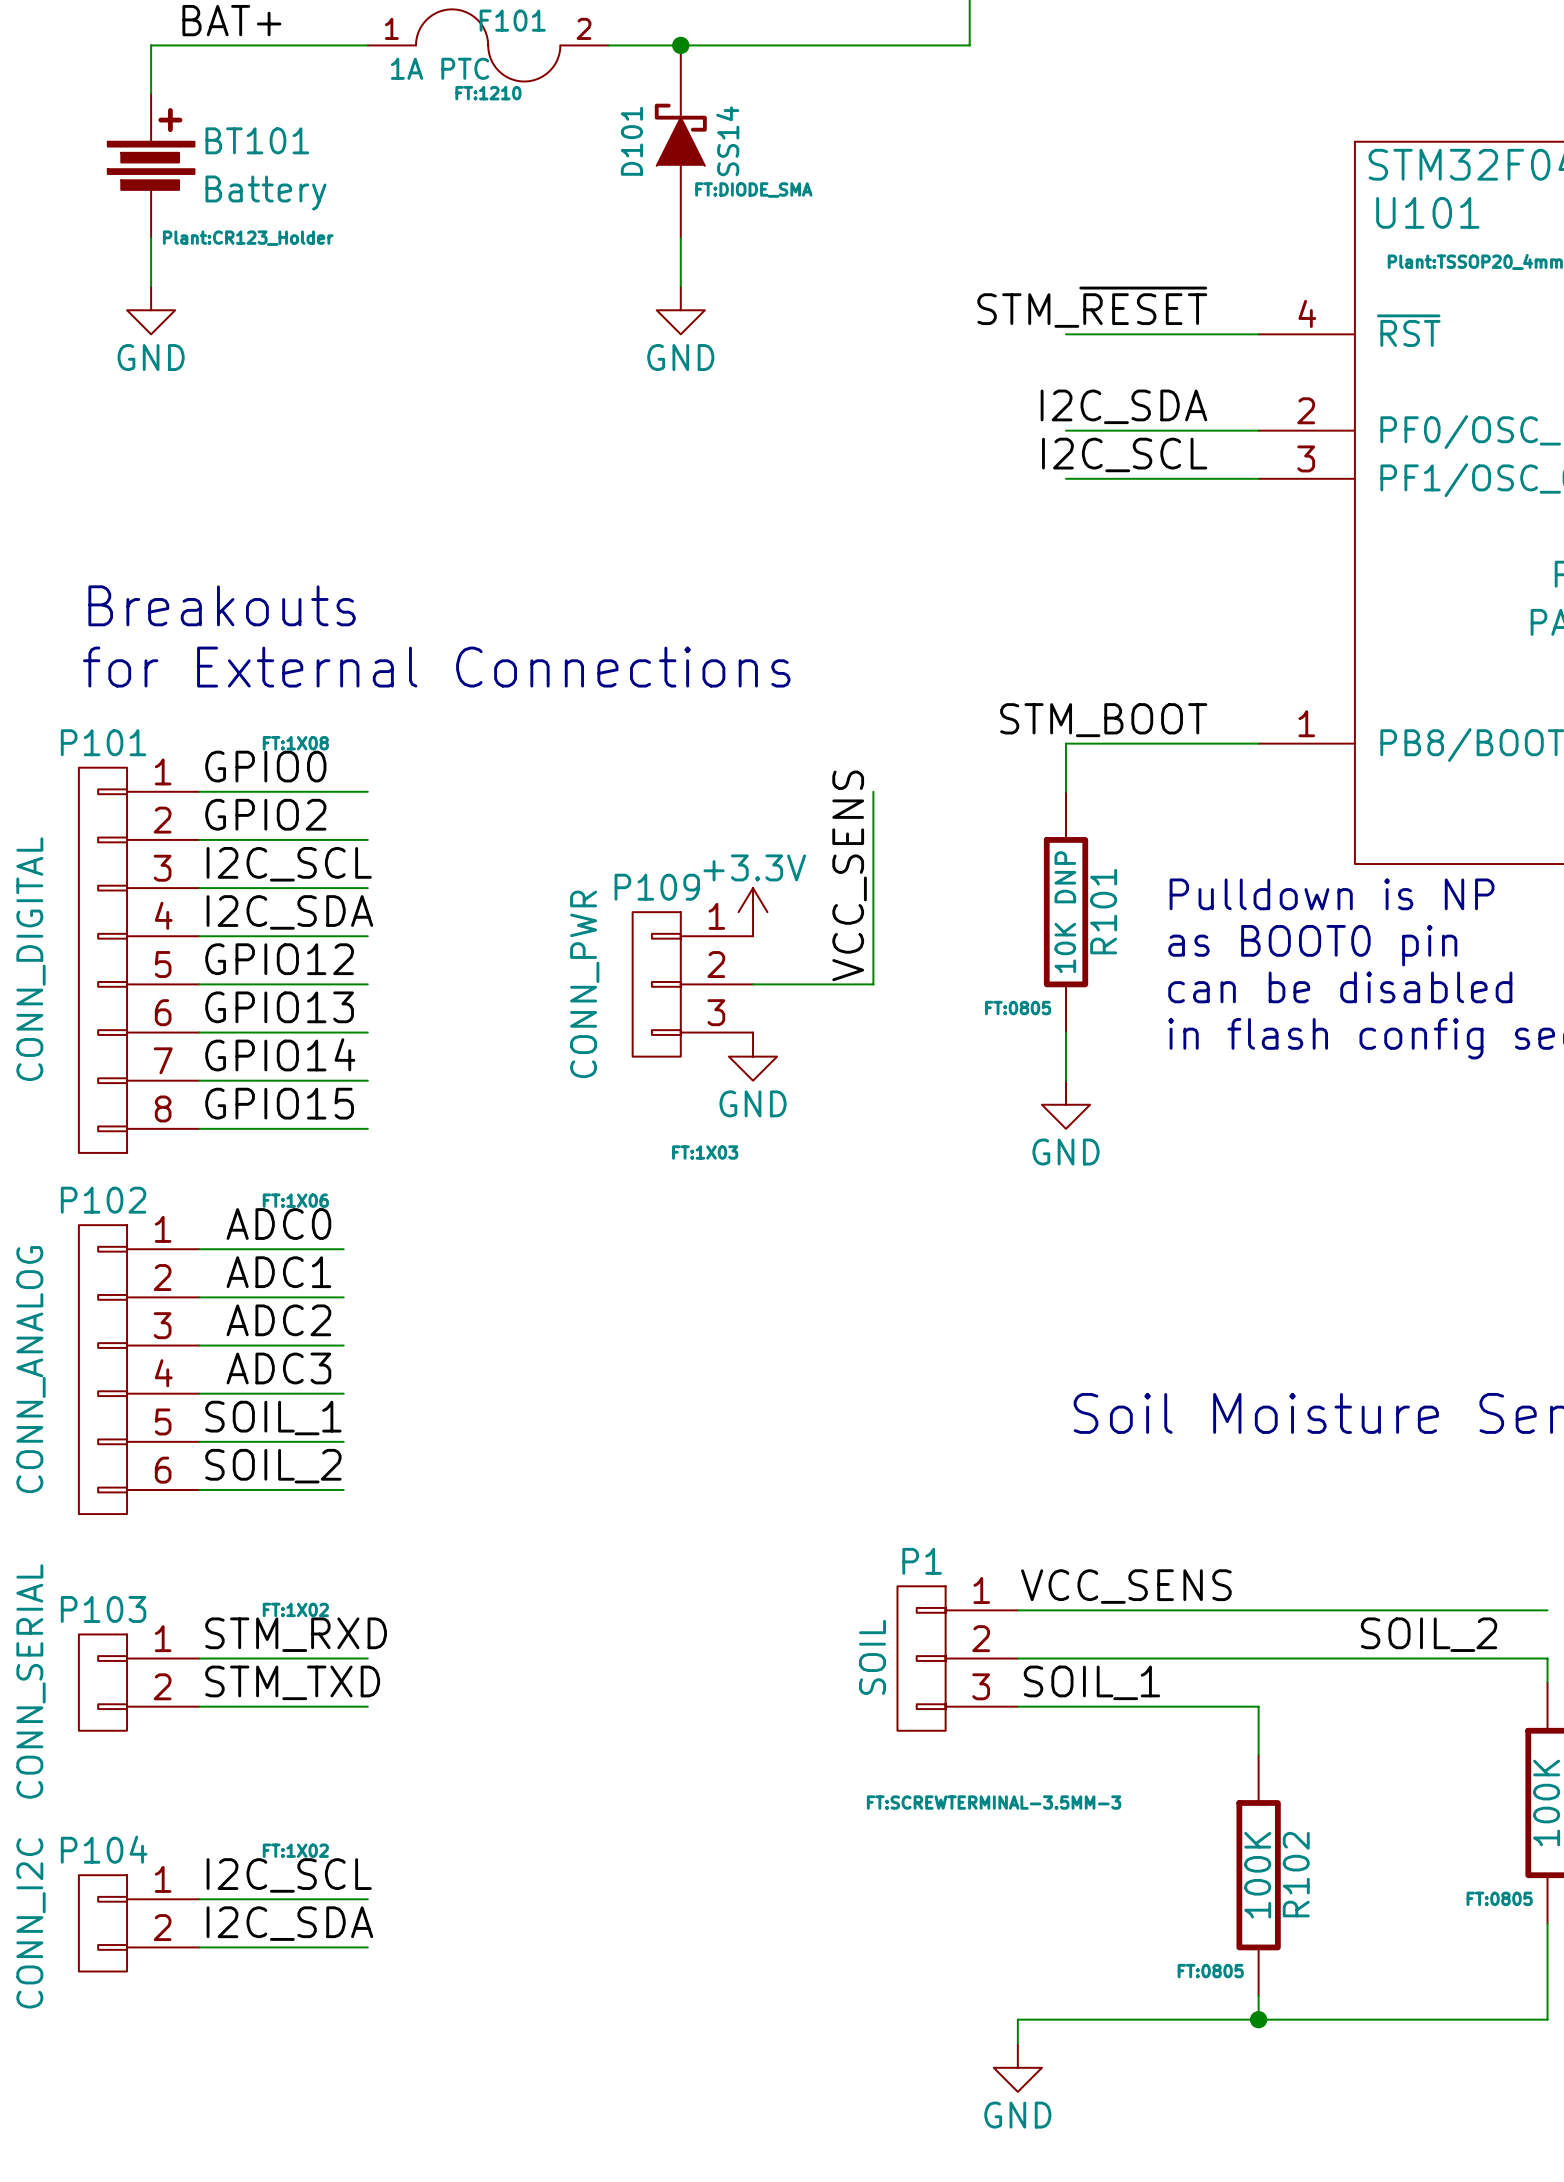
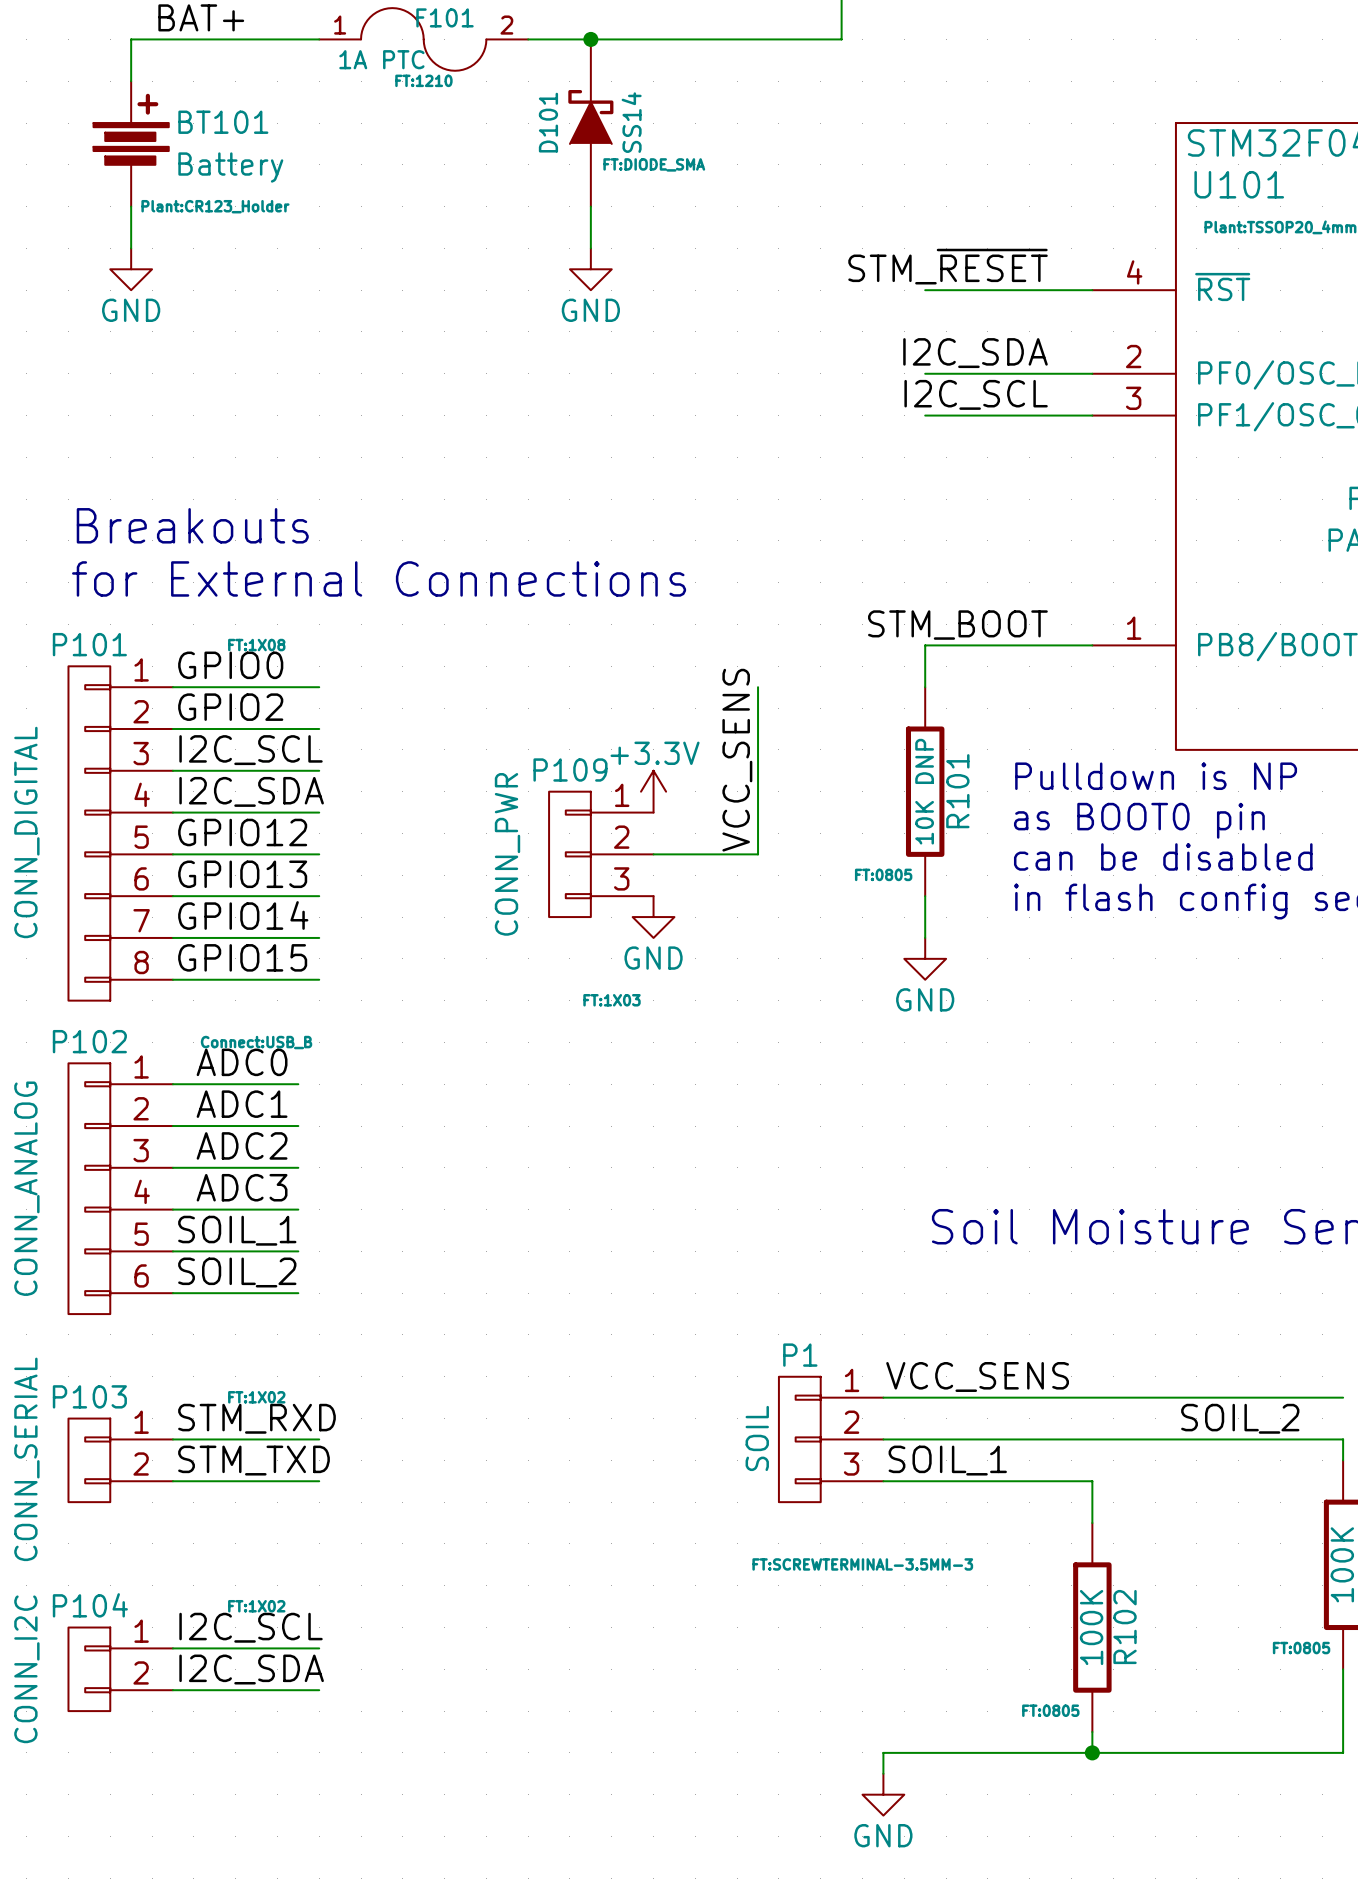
P102 text: FT:1X06 (295, 1200) -> Connect:USB_B (256, 1042)

